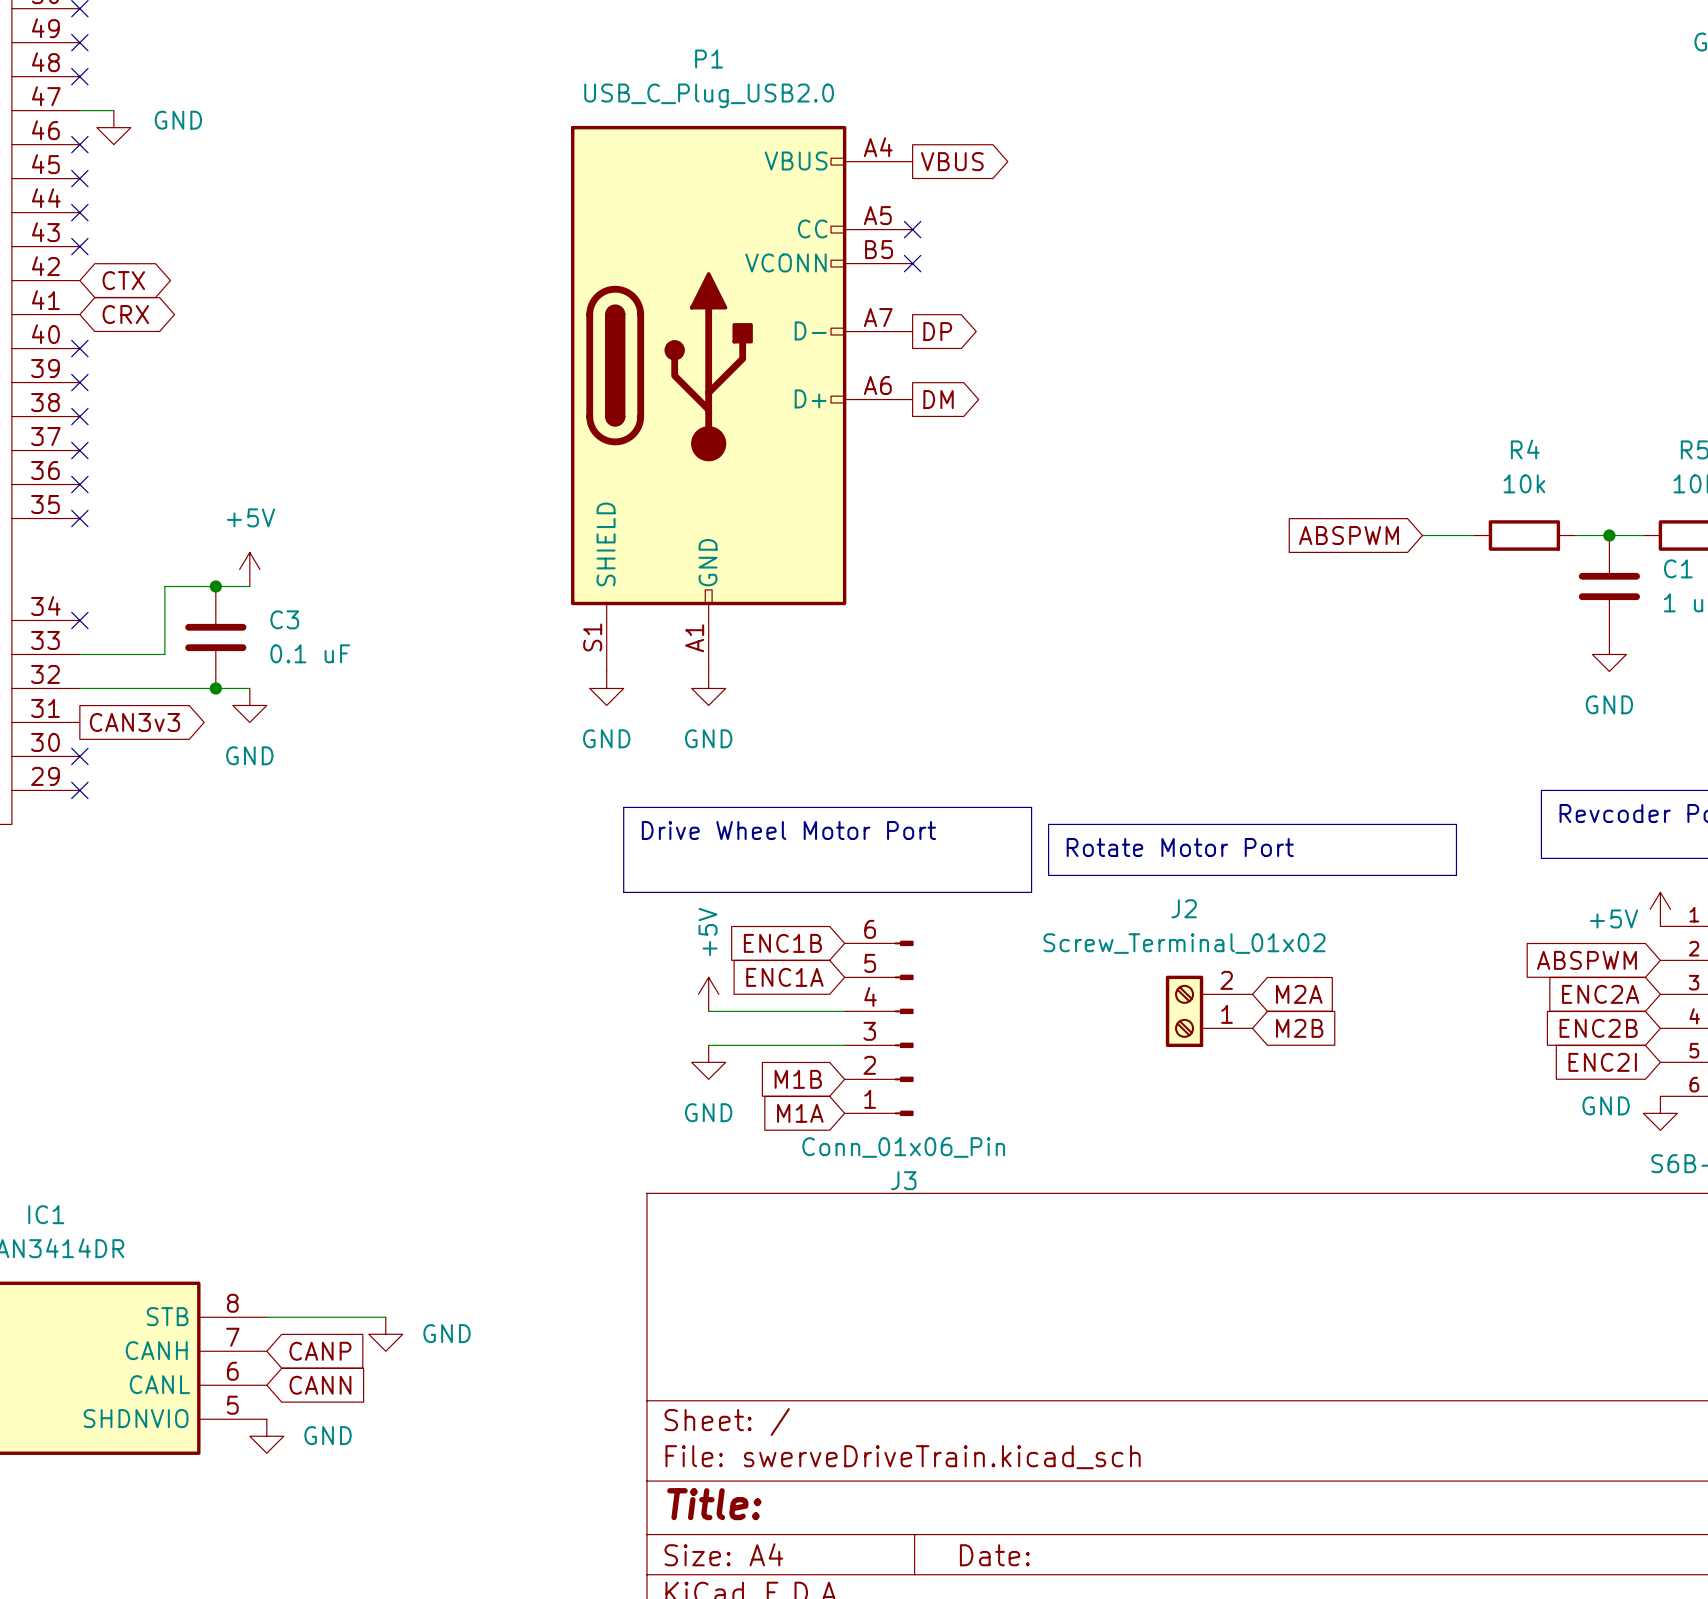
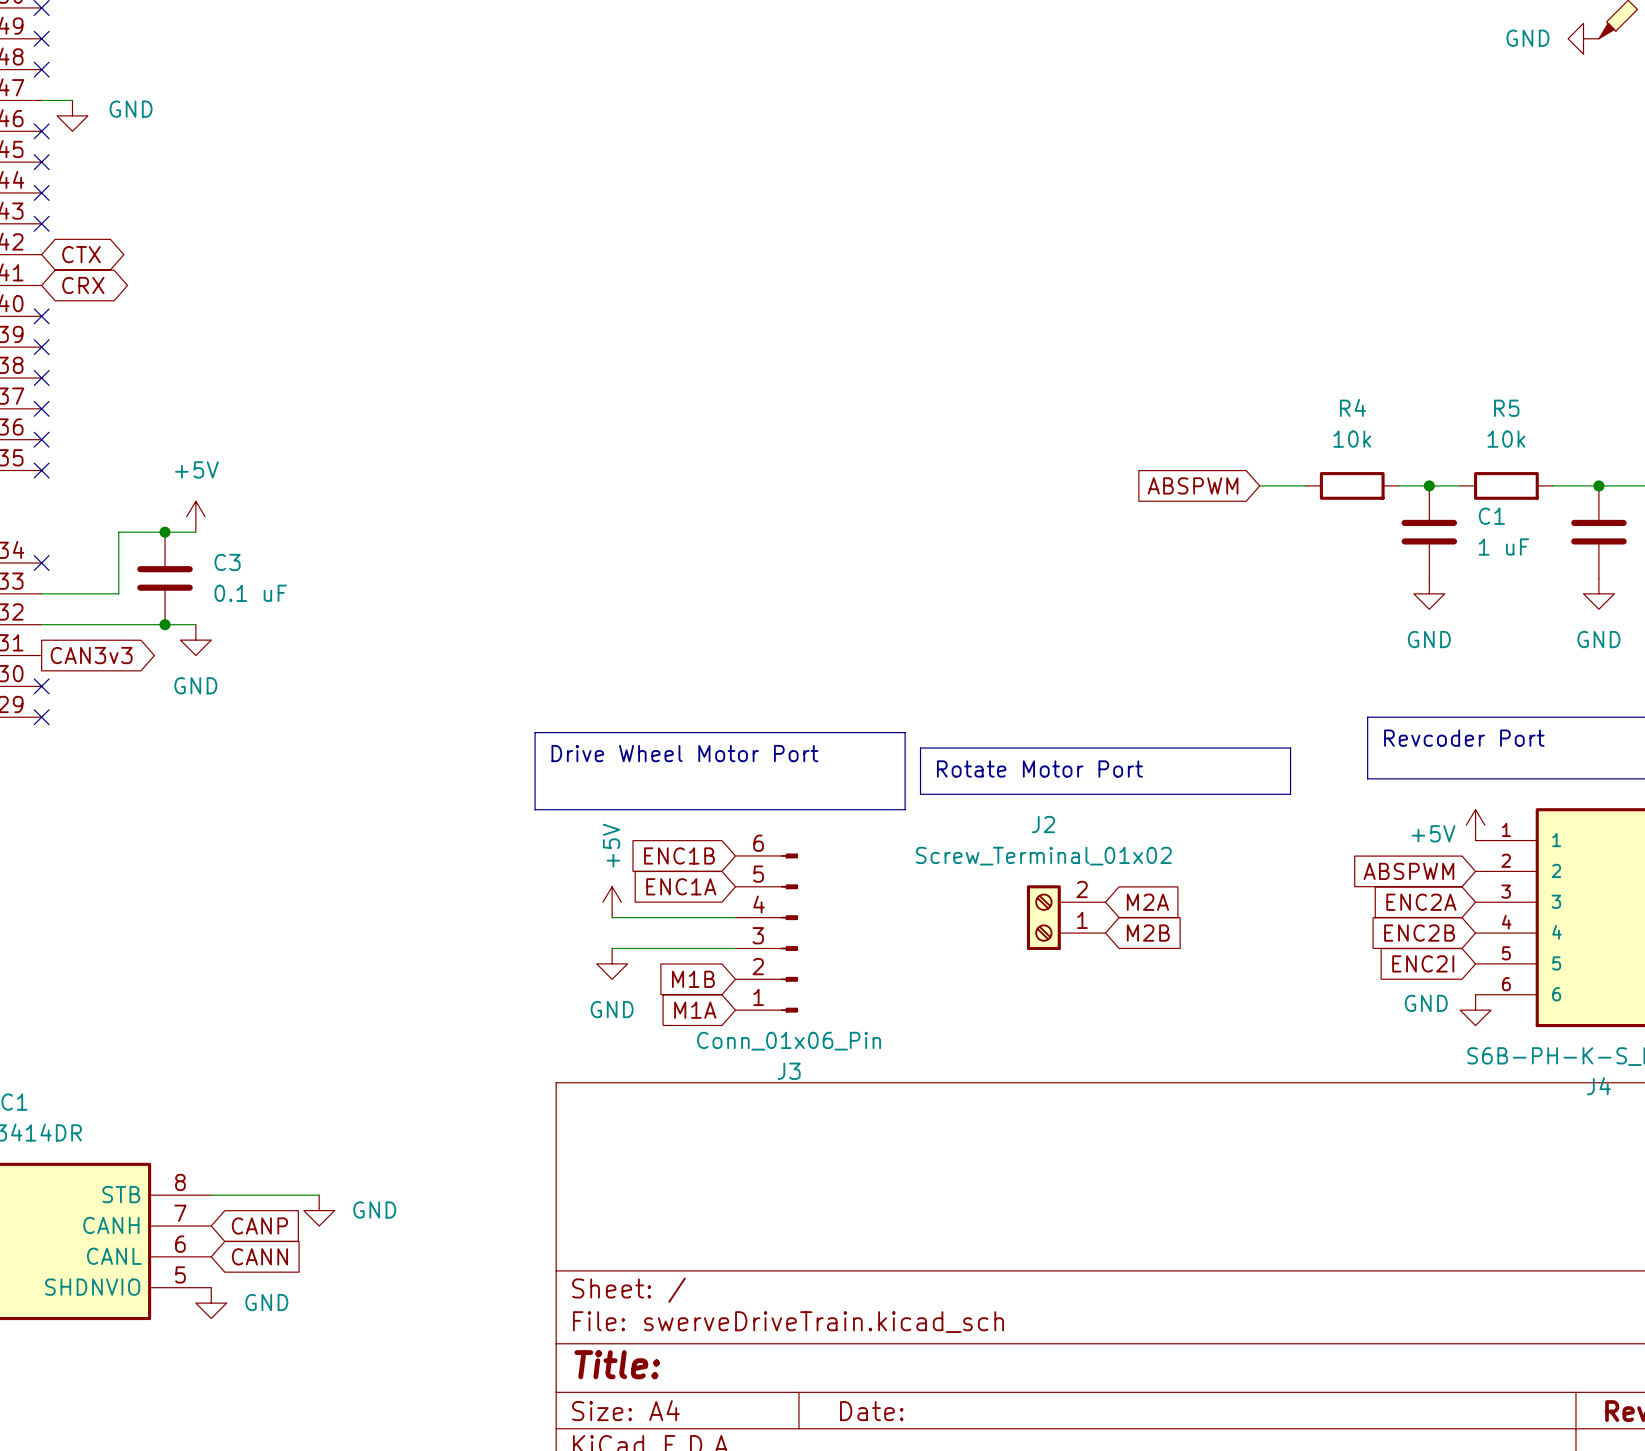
global label: VBUS (952, 161) -> none
no-connect mark: (912, 229) -> none
no-connect mark: (912, 263) -> none
global label: DP (937, 331) -> none
P1: USB_C_Plug_USB2.0 (741, 398) -> none
global label: DM (938, 399) -> none
power symbol: GND (606, 688) -> none
power symbol: GND (708, 688) -> none

